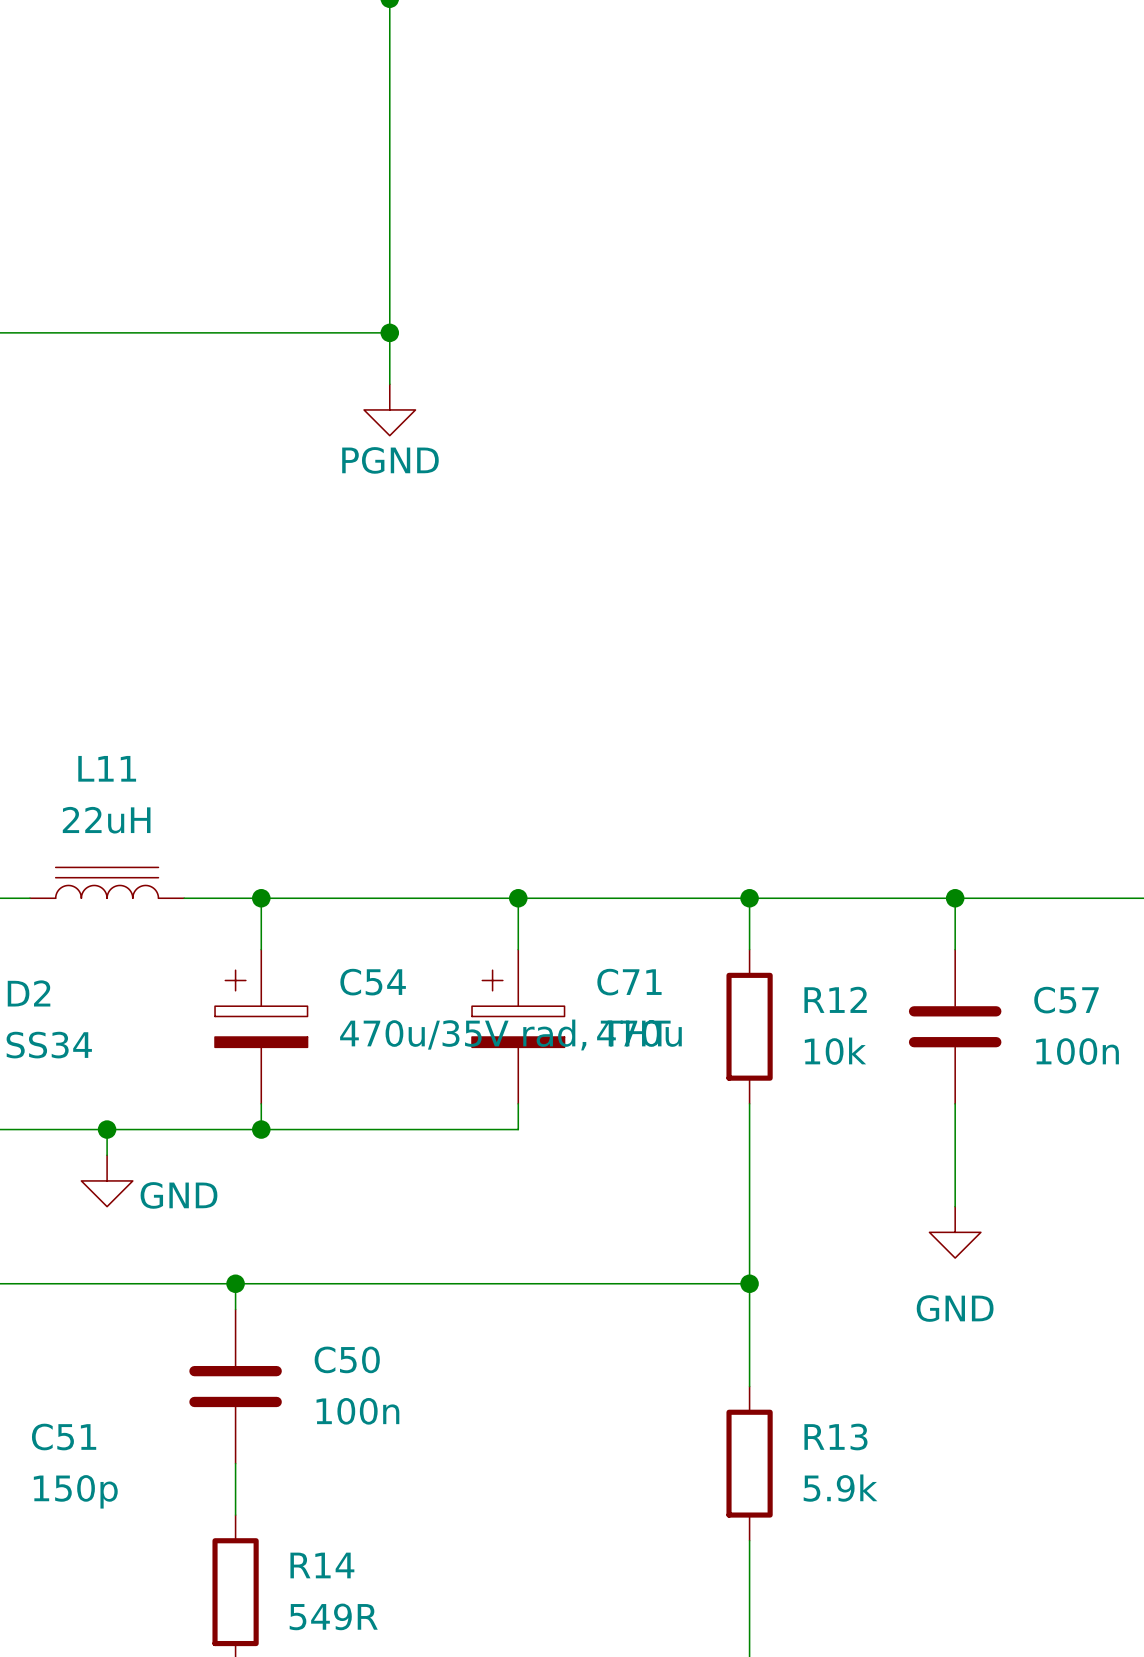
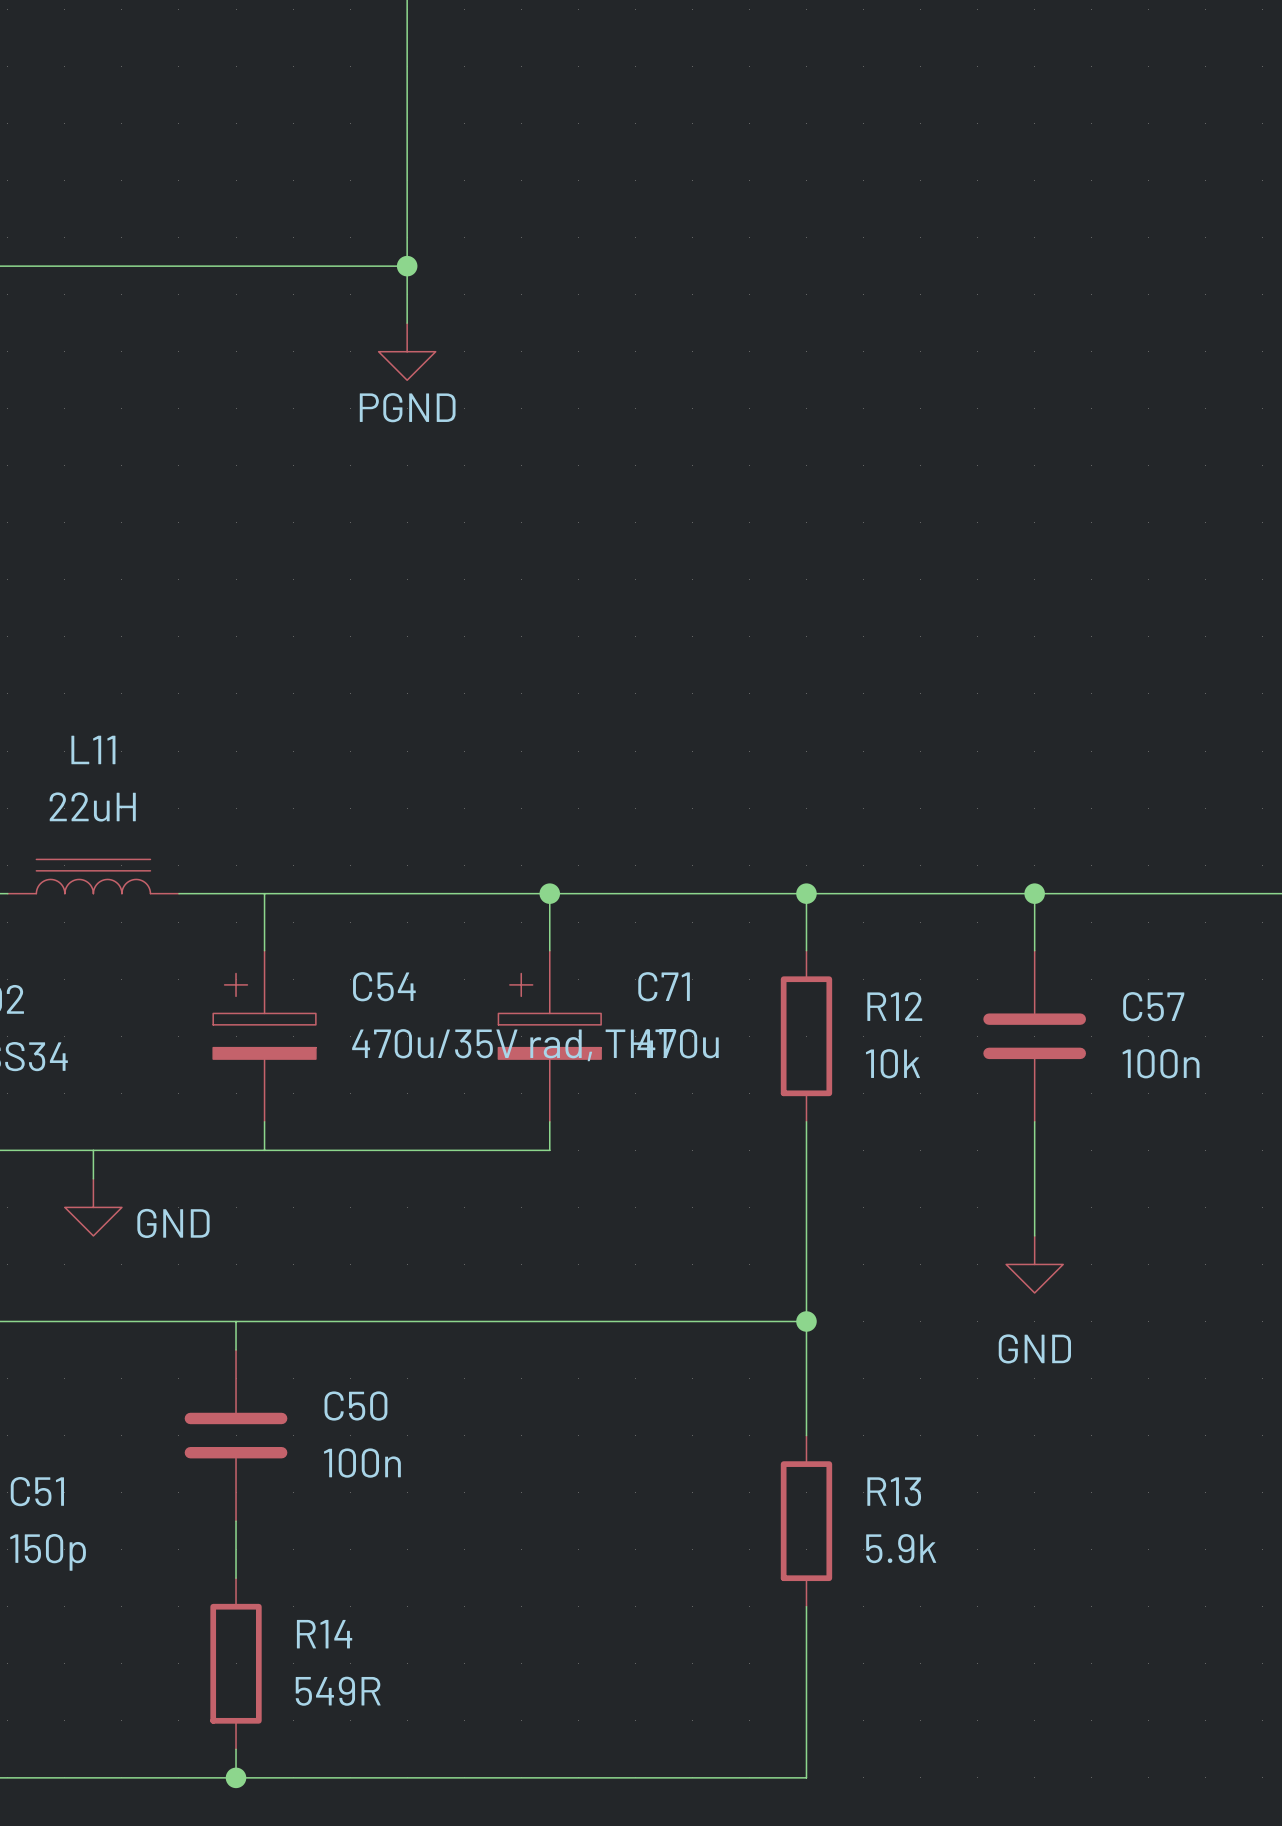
junction: (261, 898) -> none
junction: (107, 1129) -> none
junction: (261, 1129) -> none
junction: (235, 1283) -> none

